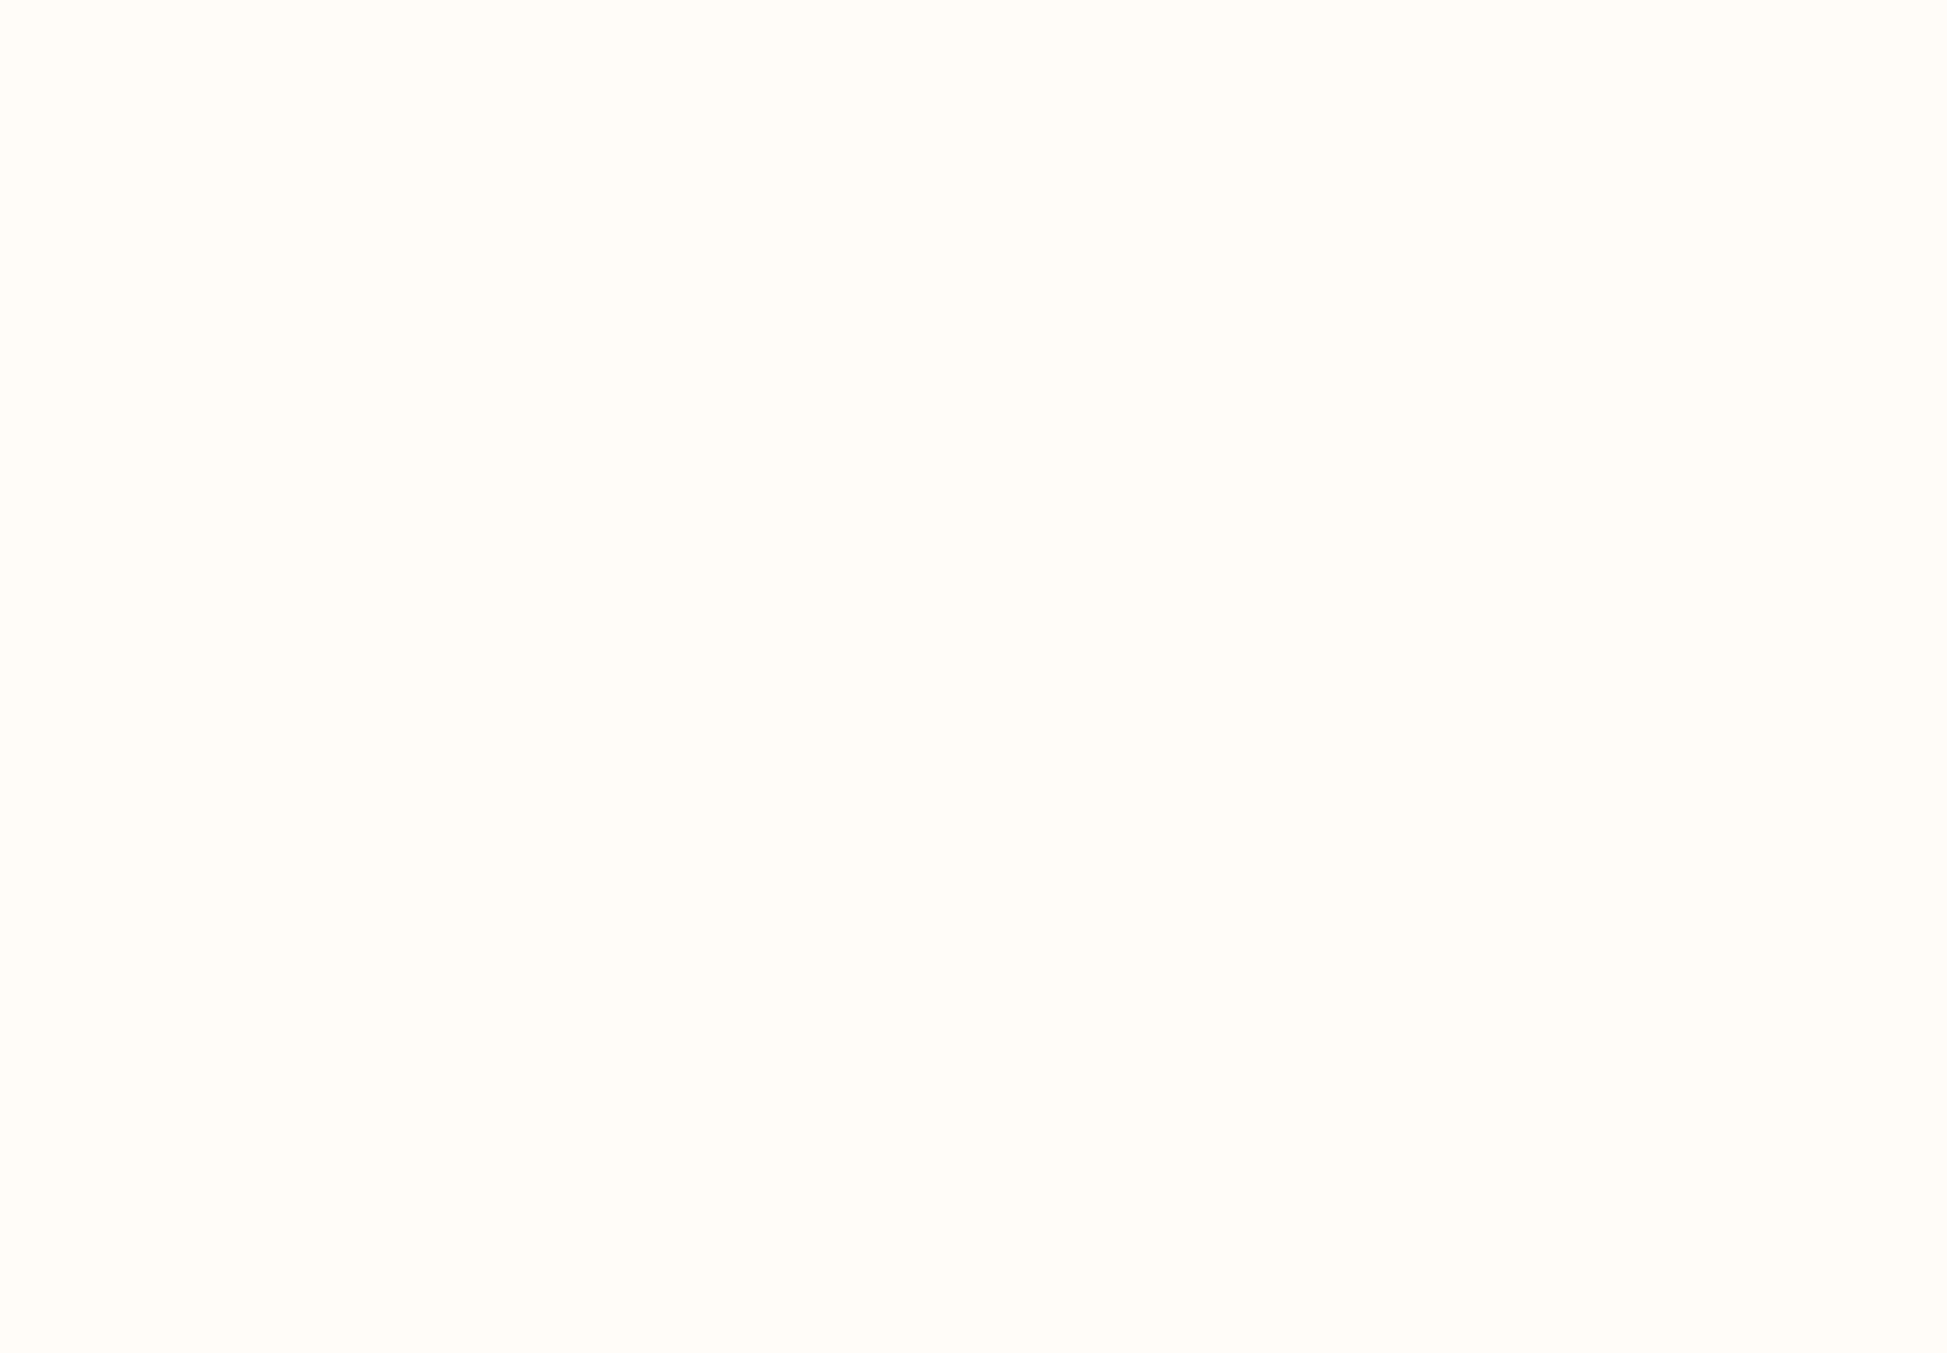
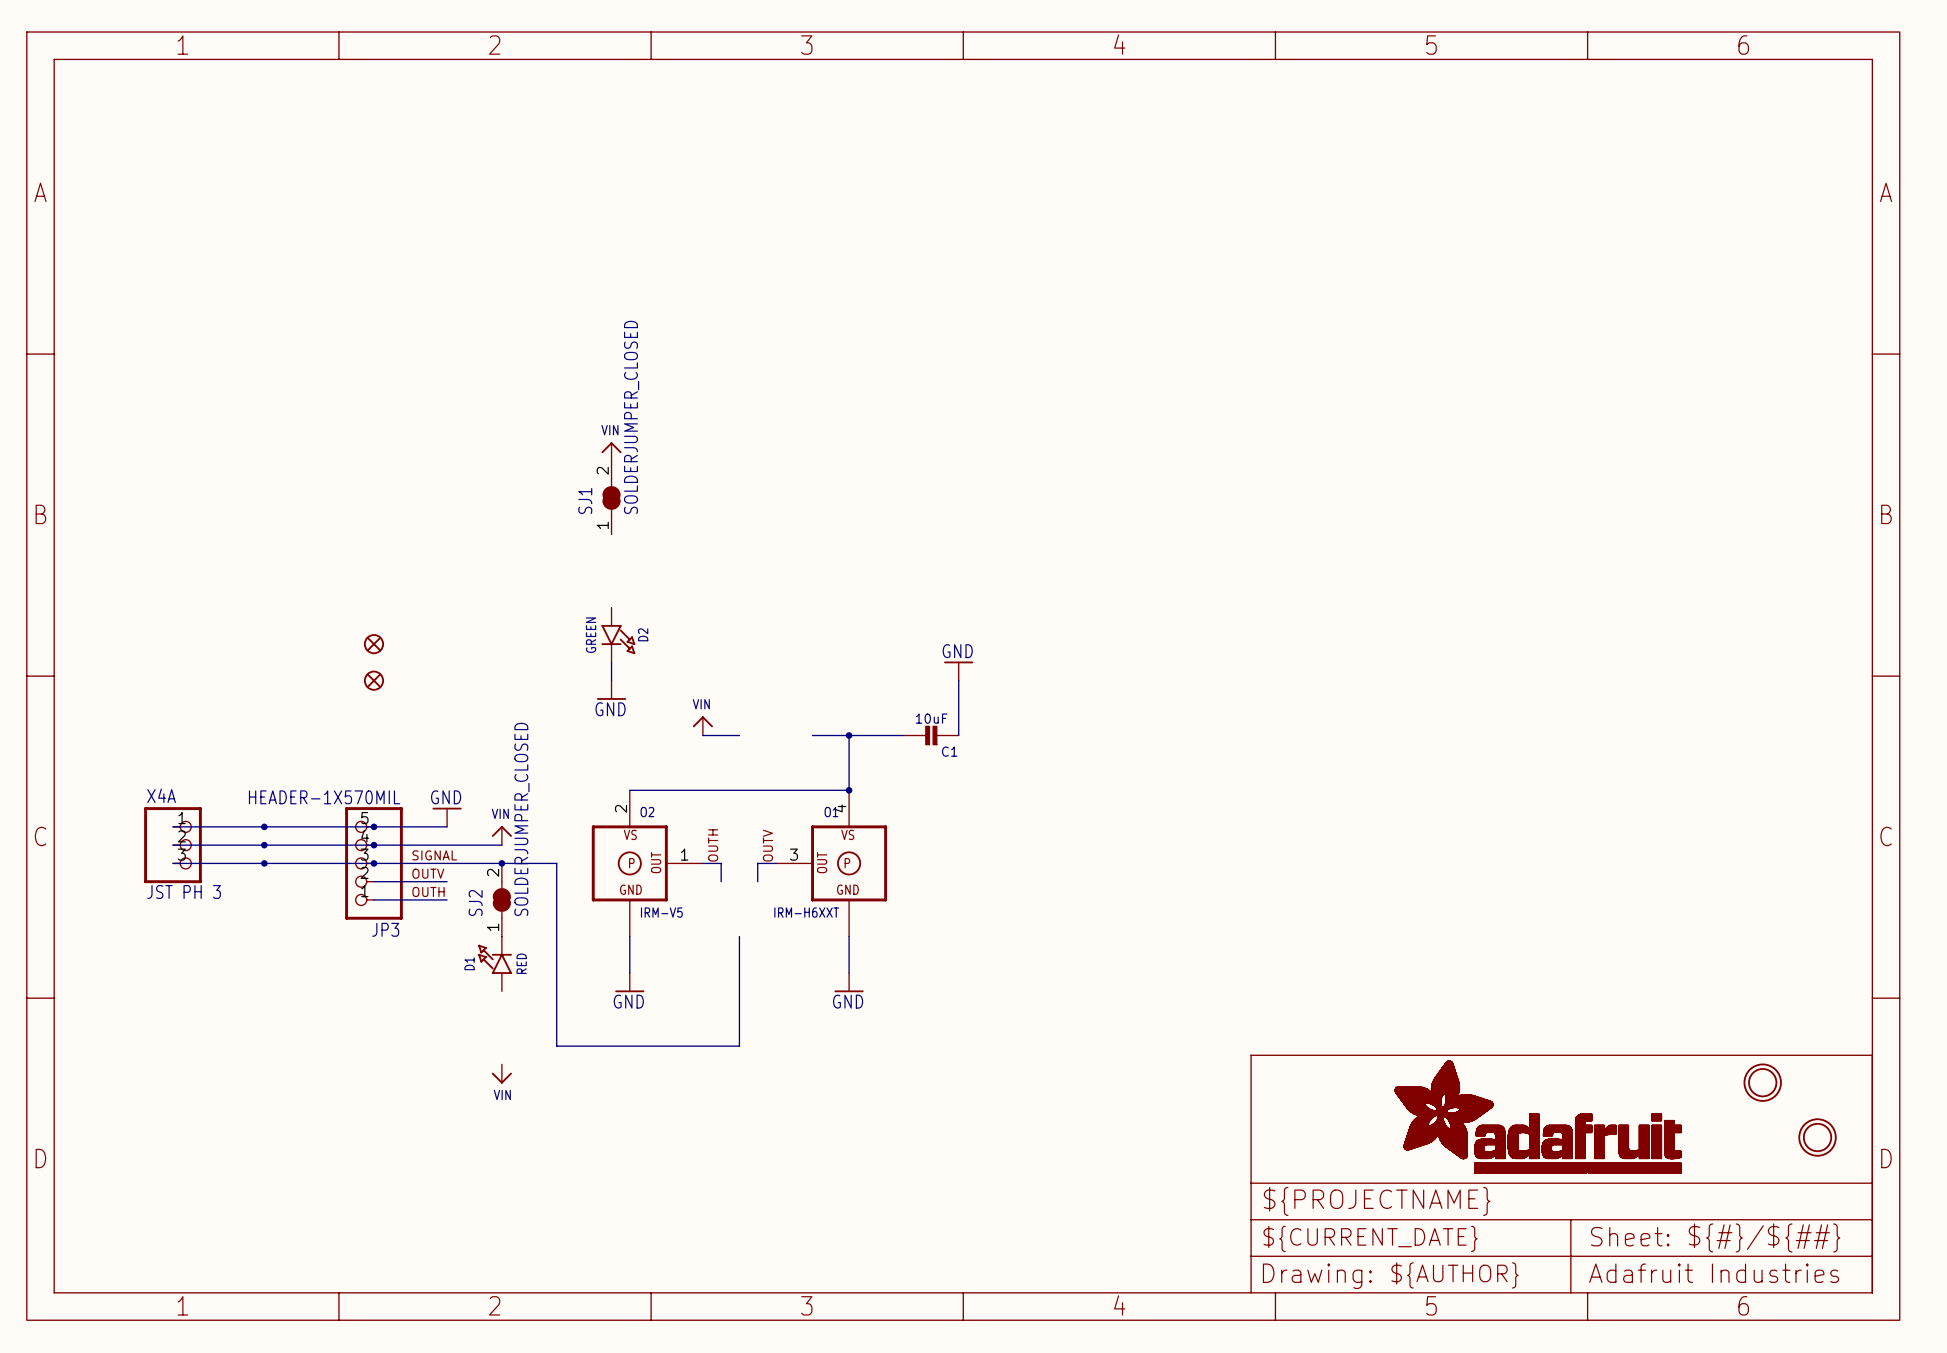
drawing: none -> [26, 32, 1900, 1321]
power symbol: none -> VIN (611, 451)
SJ1: none -> SOLDERJUMPER_CLOSED (611, 497)
D2: none -> GREEN (618, 635)
part: none -> (373, 644)
wire: none -> (611, 662) (611, 680)
power symbol: none -> GND (958, 671)
part: none -> (373, 680)
wire: none -> (958, 680) (958, 735)
power symbol: none -> GND (611, 690)
power symbol: none -> VIN (702, 725)
wire: none -> (702, 735) (739, 735)
wire: none -> (812, 735) (903, 735)
wire: none -> (849, 735) (849, 790) (629, 790)
junction: none -> (849, 735)
C1: none -> 10uF (931, 735)
junction: none -> (849, 790)
power symbol: none -> GND (447, 817)
wire: none -> (172, 826) (447, 826)
junction: none -> (264, 826)
junction: none -> (373, 826)
power symbol: none -> VIN (501, 835)
wire: none -> (172, 845) (501, 845)
X4A: none -> JST PH 3 (172, 845)
junction: none -> (264, 845)
junction: none -> (373, 845)
label: none -> OUTH (713, 845)
label: none -> OUTV (767, 845)
label: none -> SIGNAL (434, 855)
wire: none -> (172, 863) (556, 863) (556, 1046) (739, 1046) (739, 936)
junction: none -> (264, 863)
junction: none -> (373, 863)
JP3: none -> HEADER-1X570MIL (373, 863)
junction: none -> (501, 863)
O2: none -> IRM-V5 (647, 863)
wire: none -> (702, 863) (721, 863) (721, 881)
wire: none -> (775, 863) (757, 863) (757, 881)
O1: none -> IRM-H6XXT (831, 863)
label: none -> OUTV (428, 873)
wire: none -> (373, 881) (447, 881)
label: none -> OUTH (428, 891)
wire: none -> (373, 899) (447, 899)
SJ2: none -> SOLDERJUMPER_CLOSED (501, 899)
wire: none -> (629, 936) (629, 973)
wire: none -> (849, 936) (849, 973)
D1: none -> RED (495, 963)
power symbol: none -> GND (629, 982)
power symbol: none -> GND (849, 982)
power symbol: none -> VIN (501, 1074)
part: none -> (1762, 1082)
part: none -> (1817, 1137)

